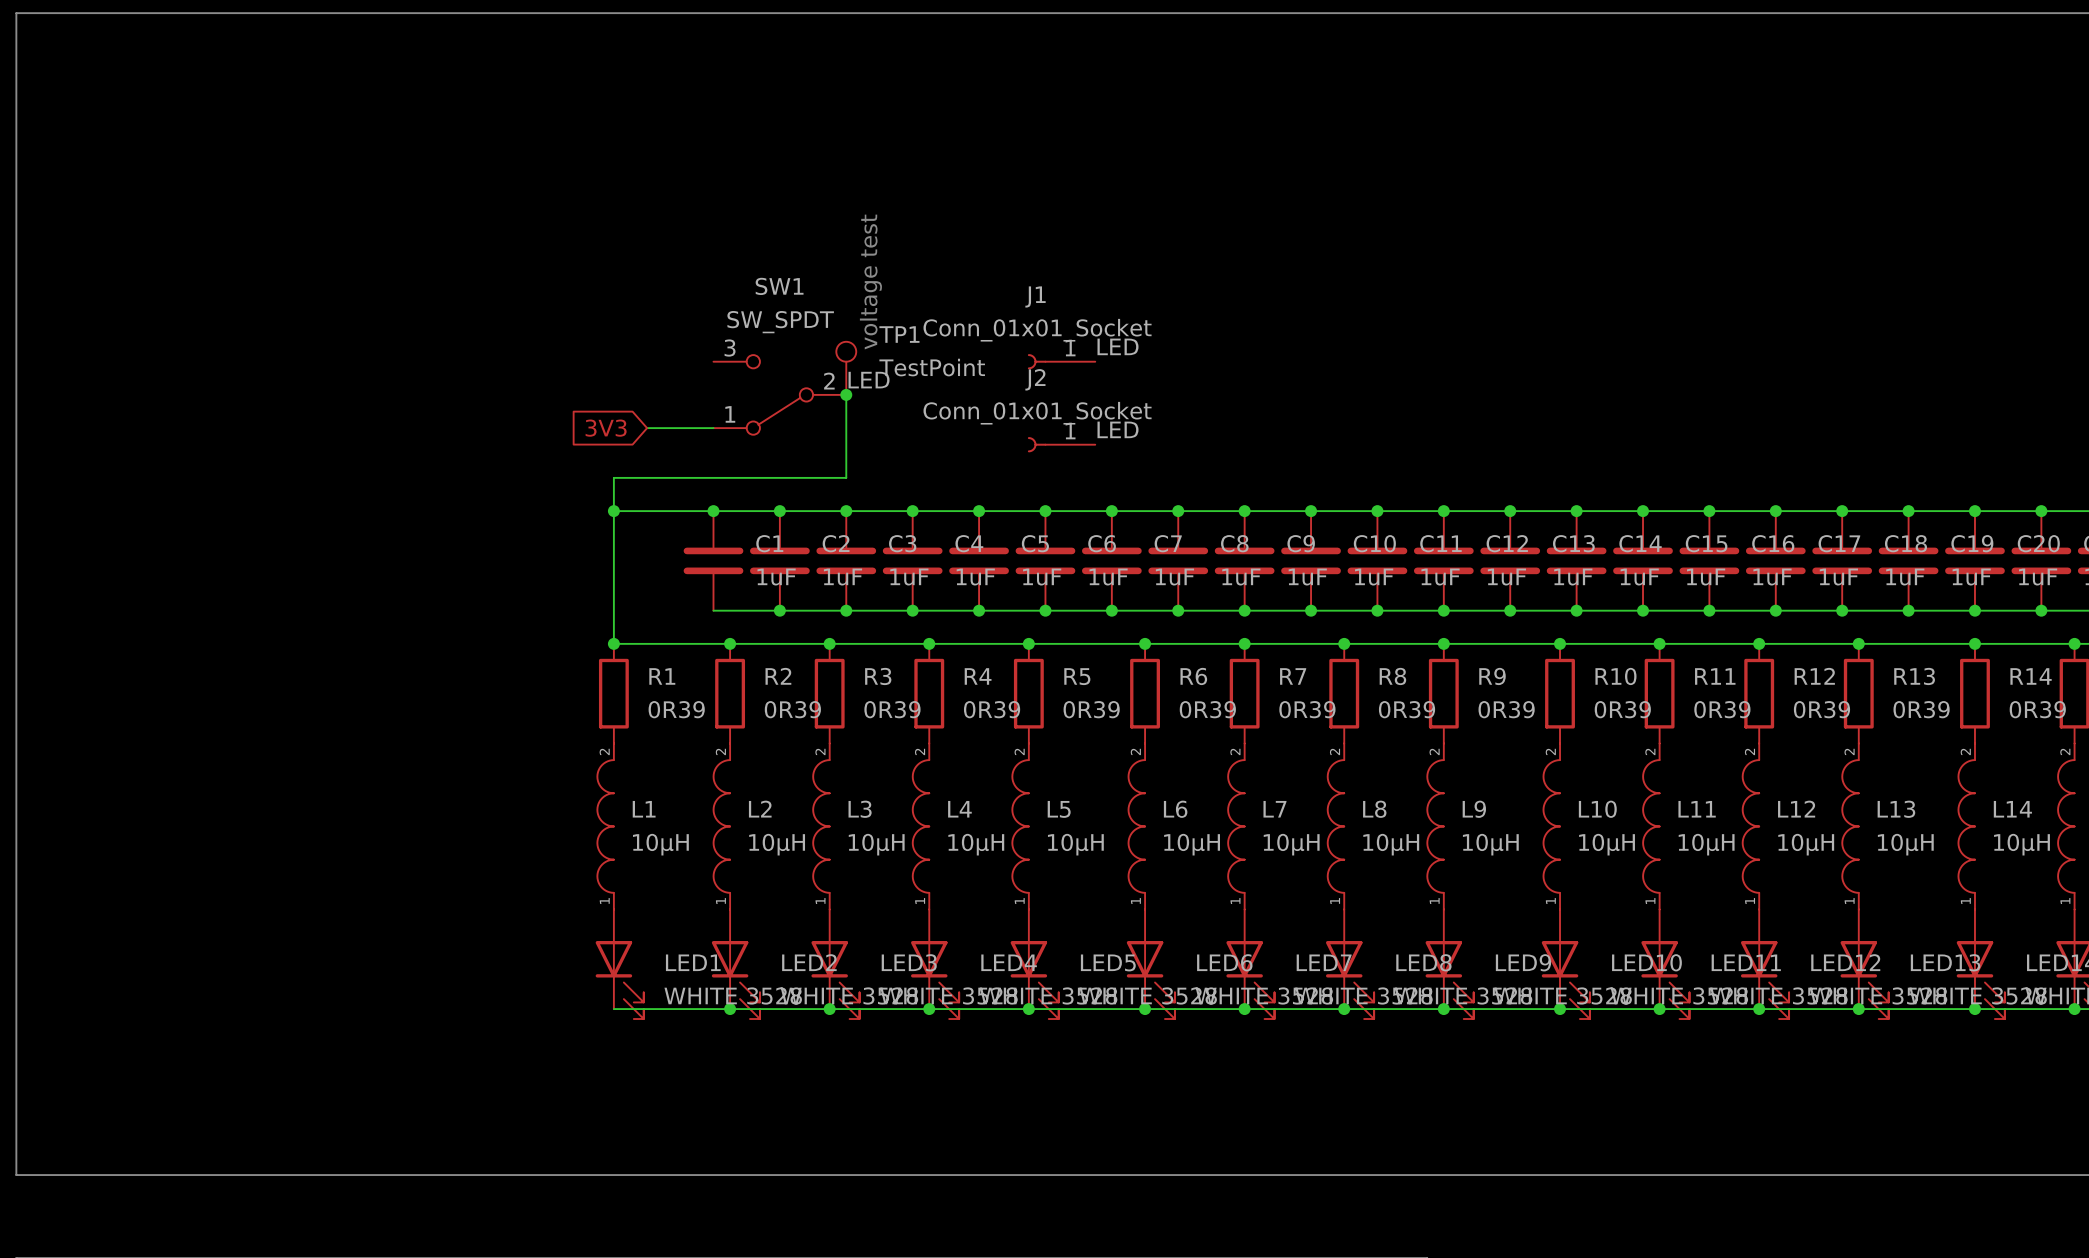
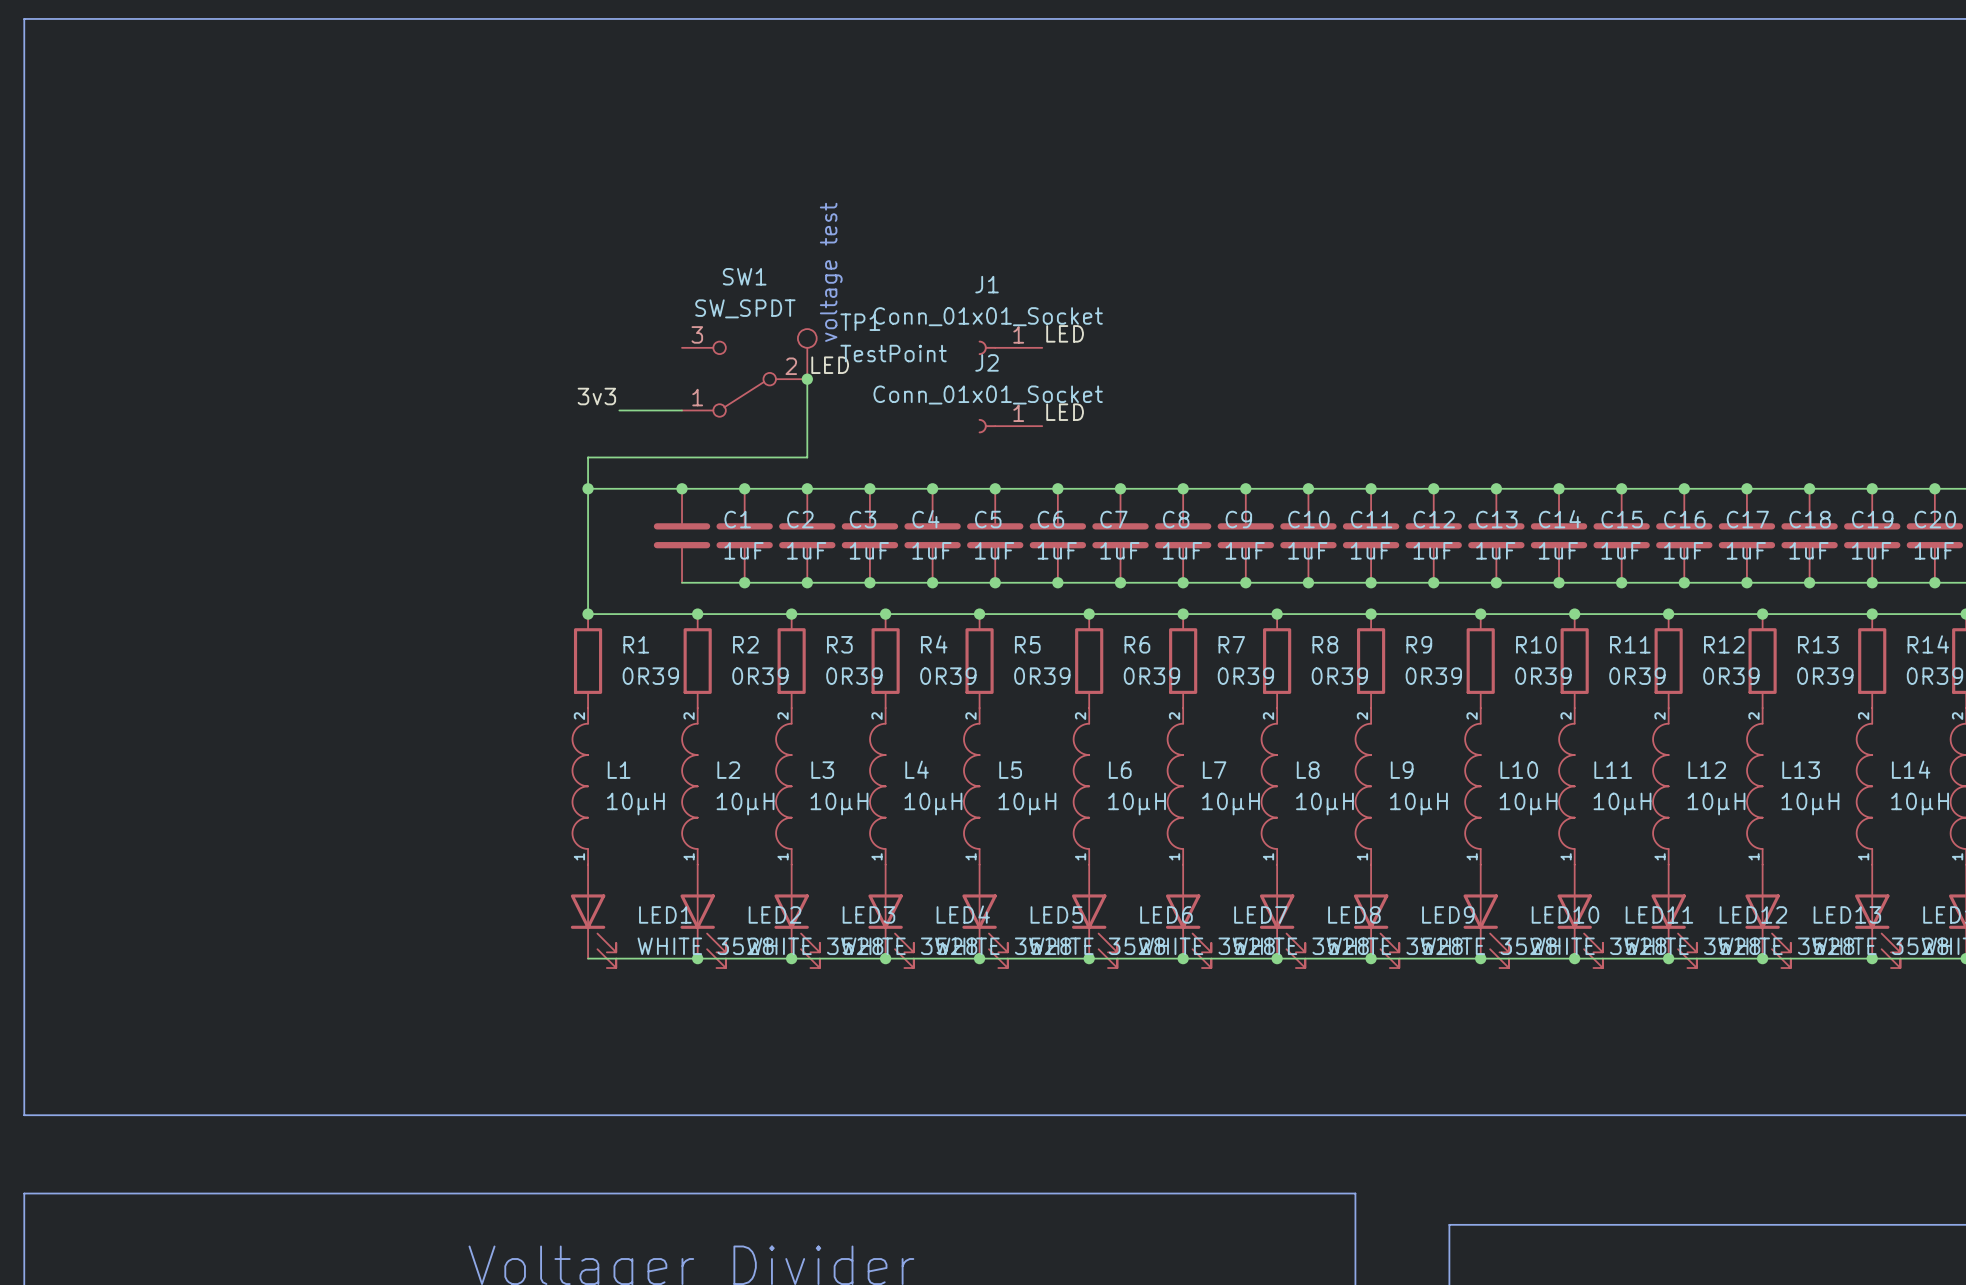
label: none -> 3v3 (596, 396)
global label: 3V3 (606, 428) -> none

